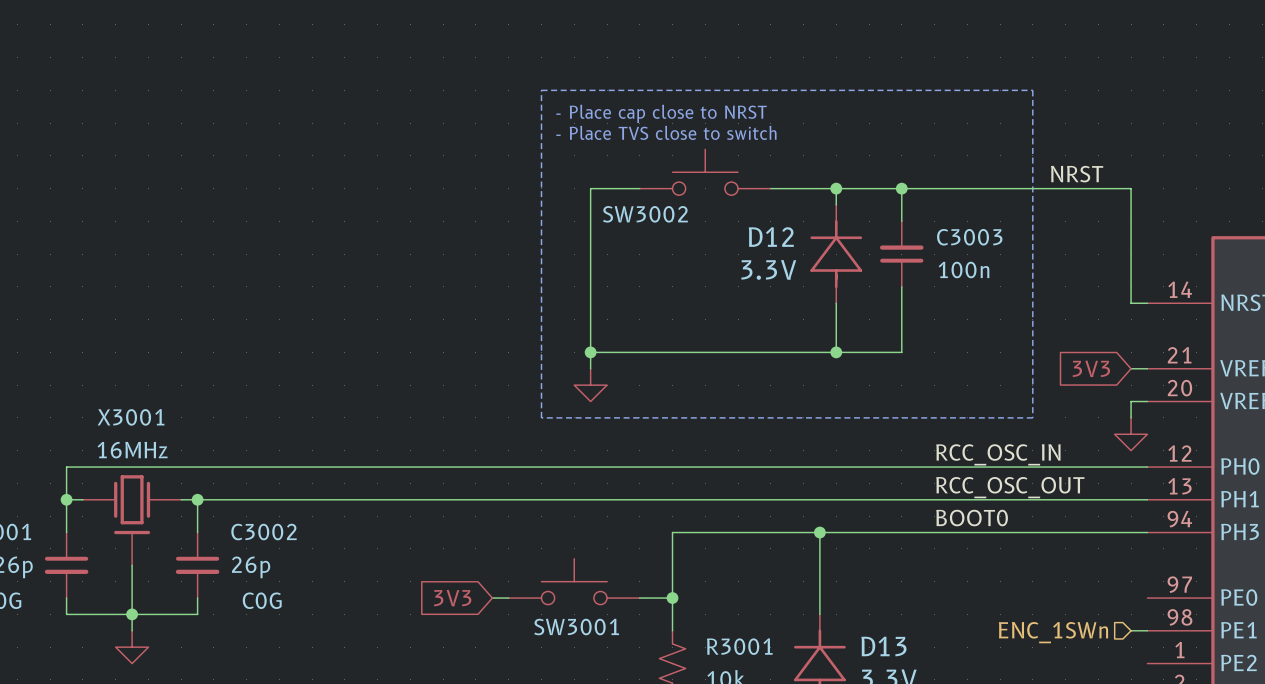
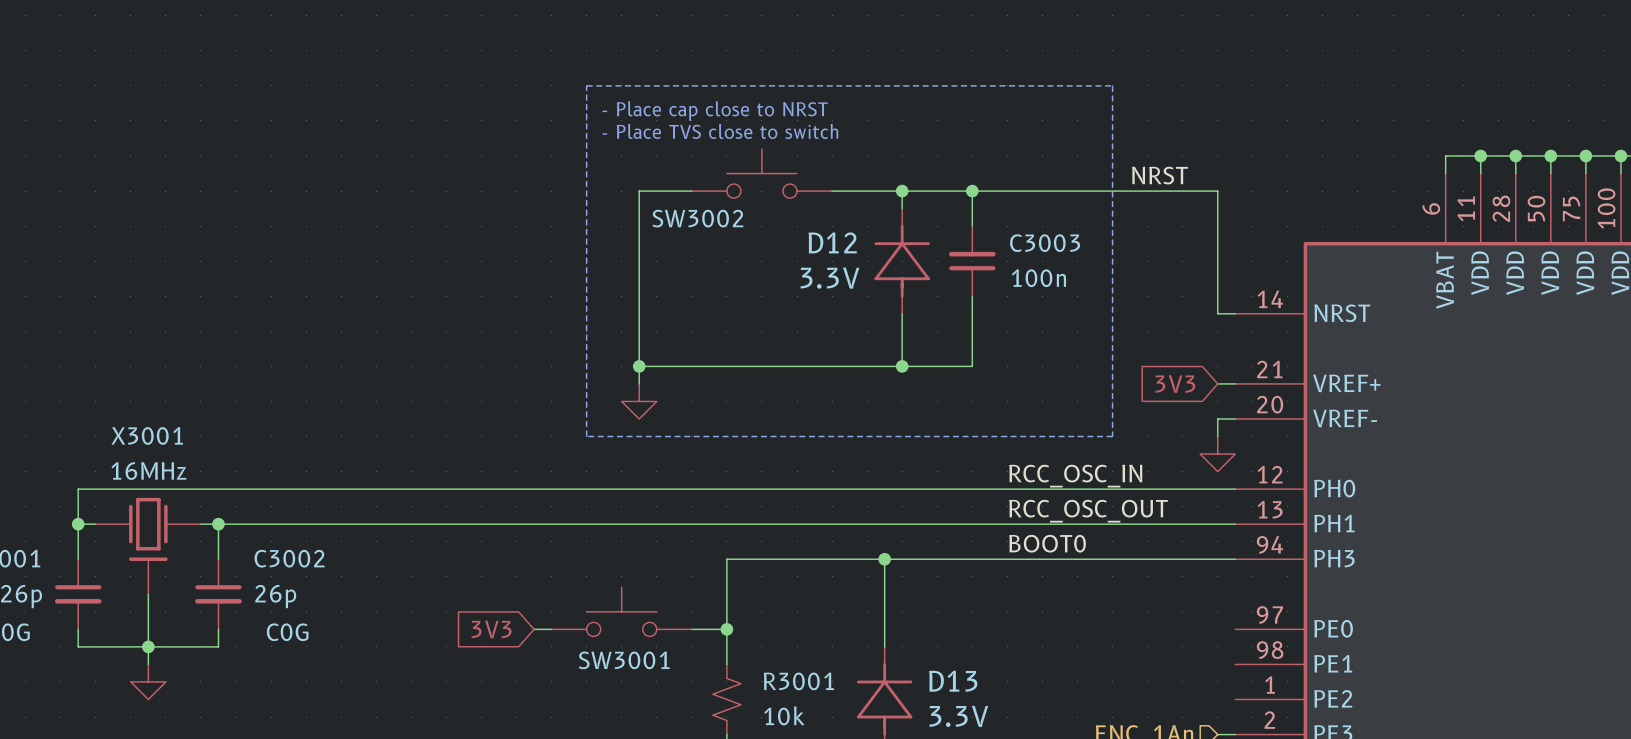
wire: (1131, 630) (1147, 630) -> none
hierarchical label: ENC_1SWn (1053, 632) -> none

